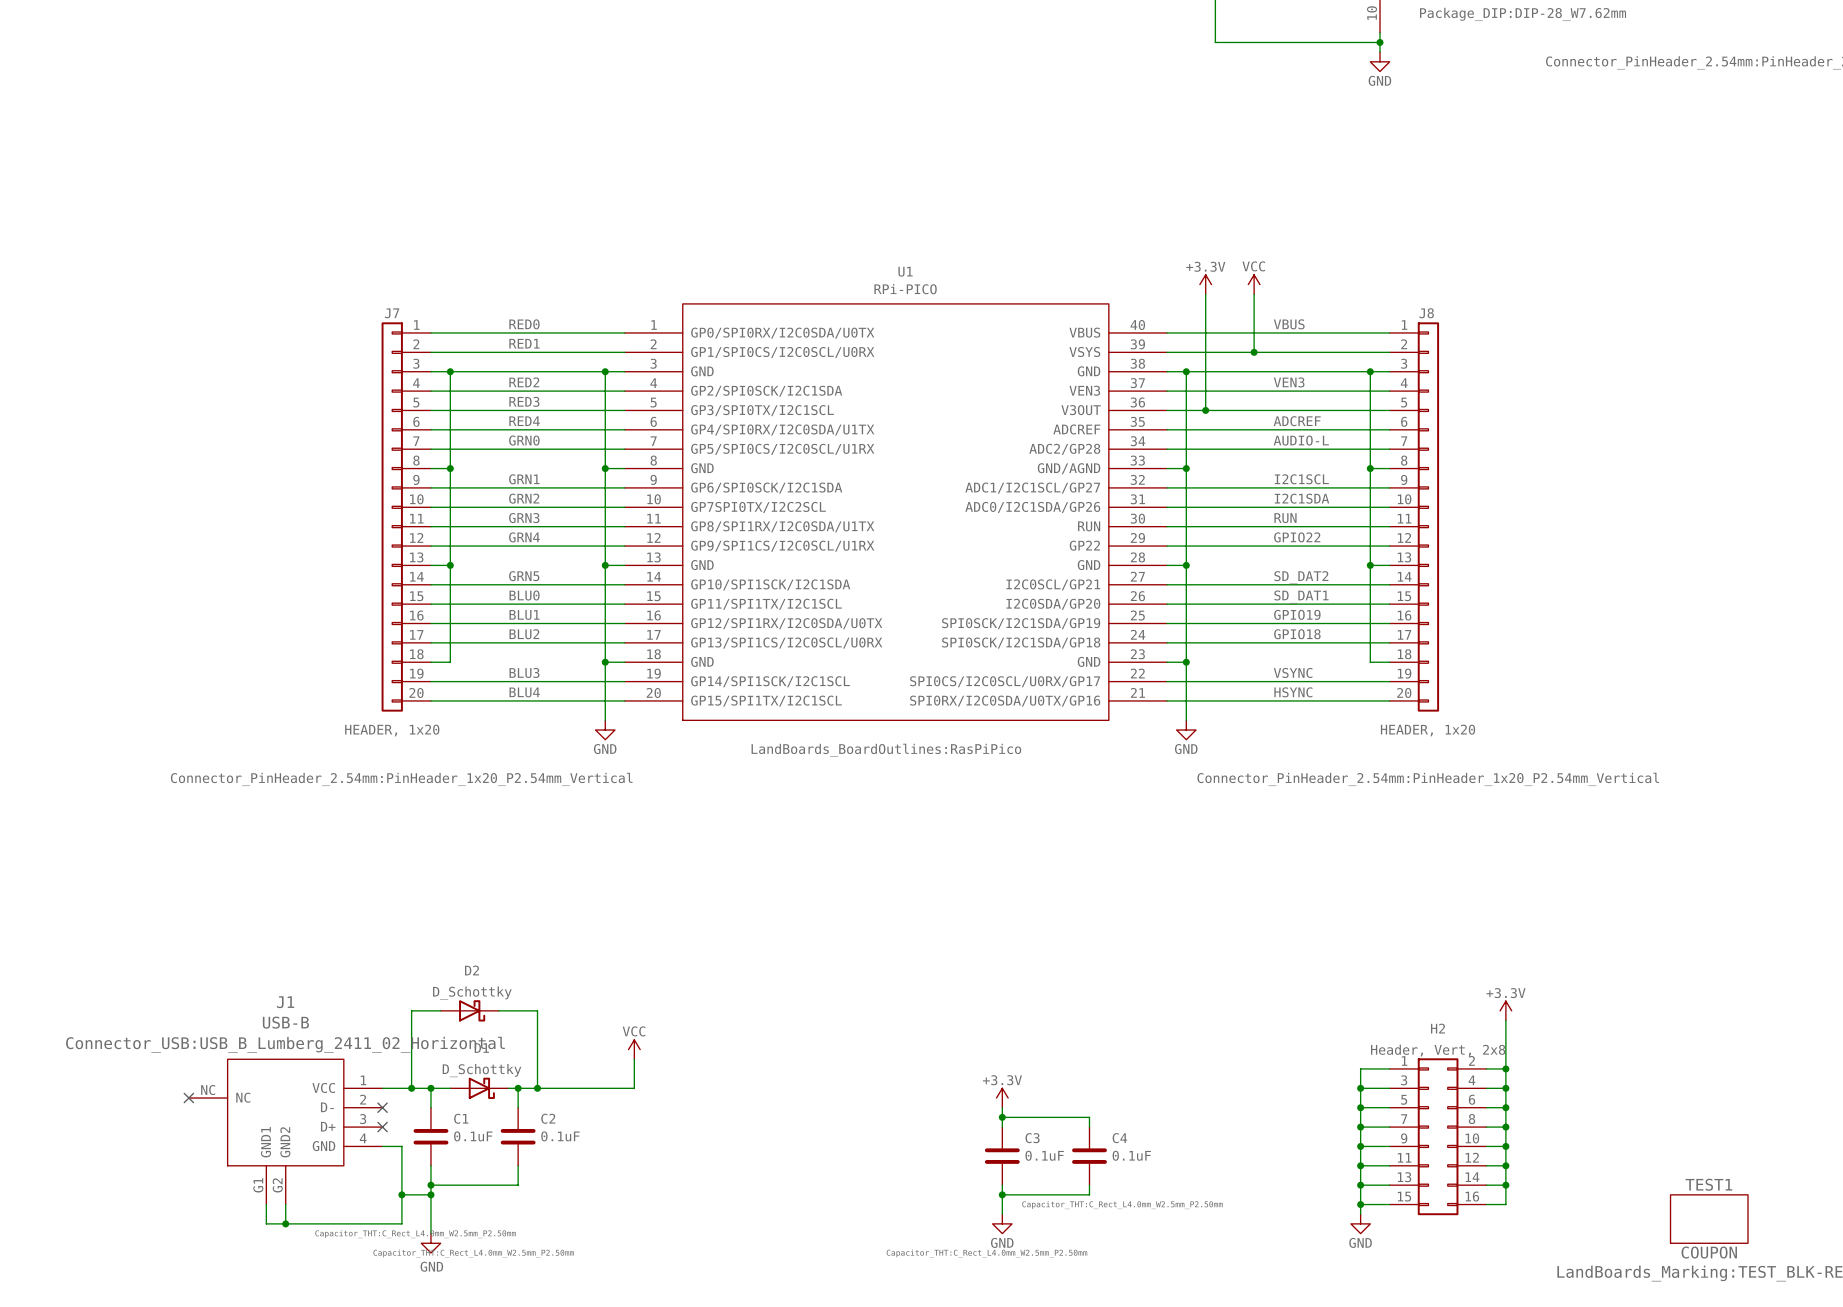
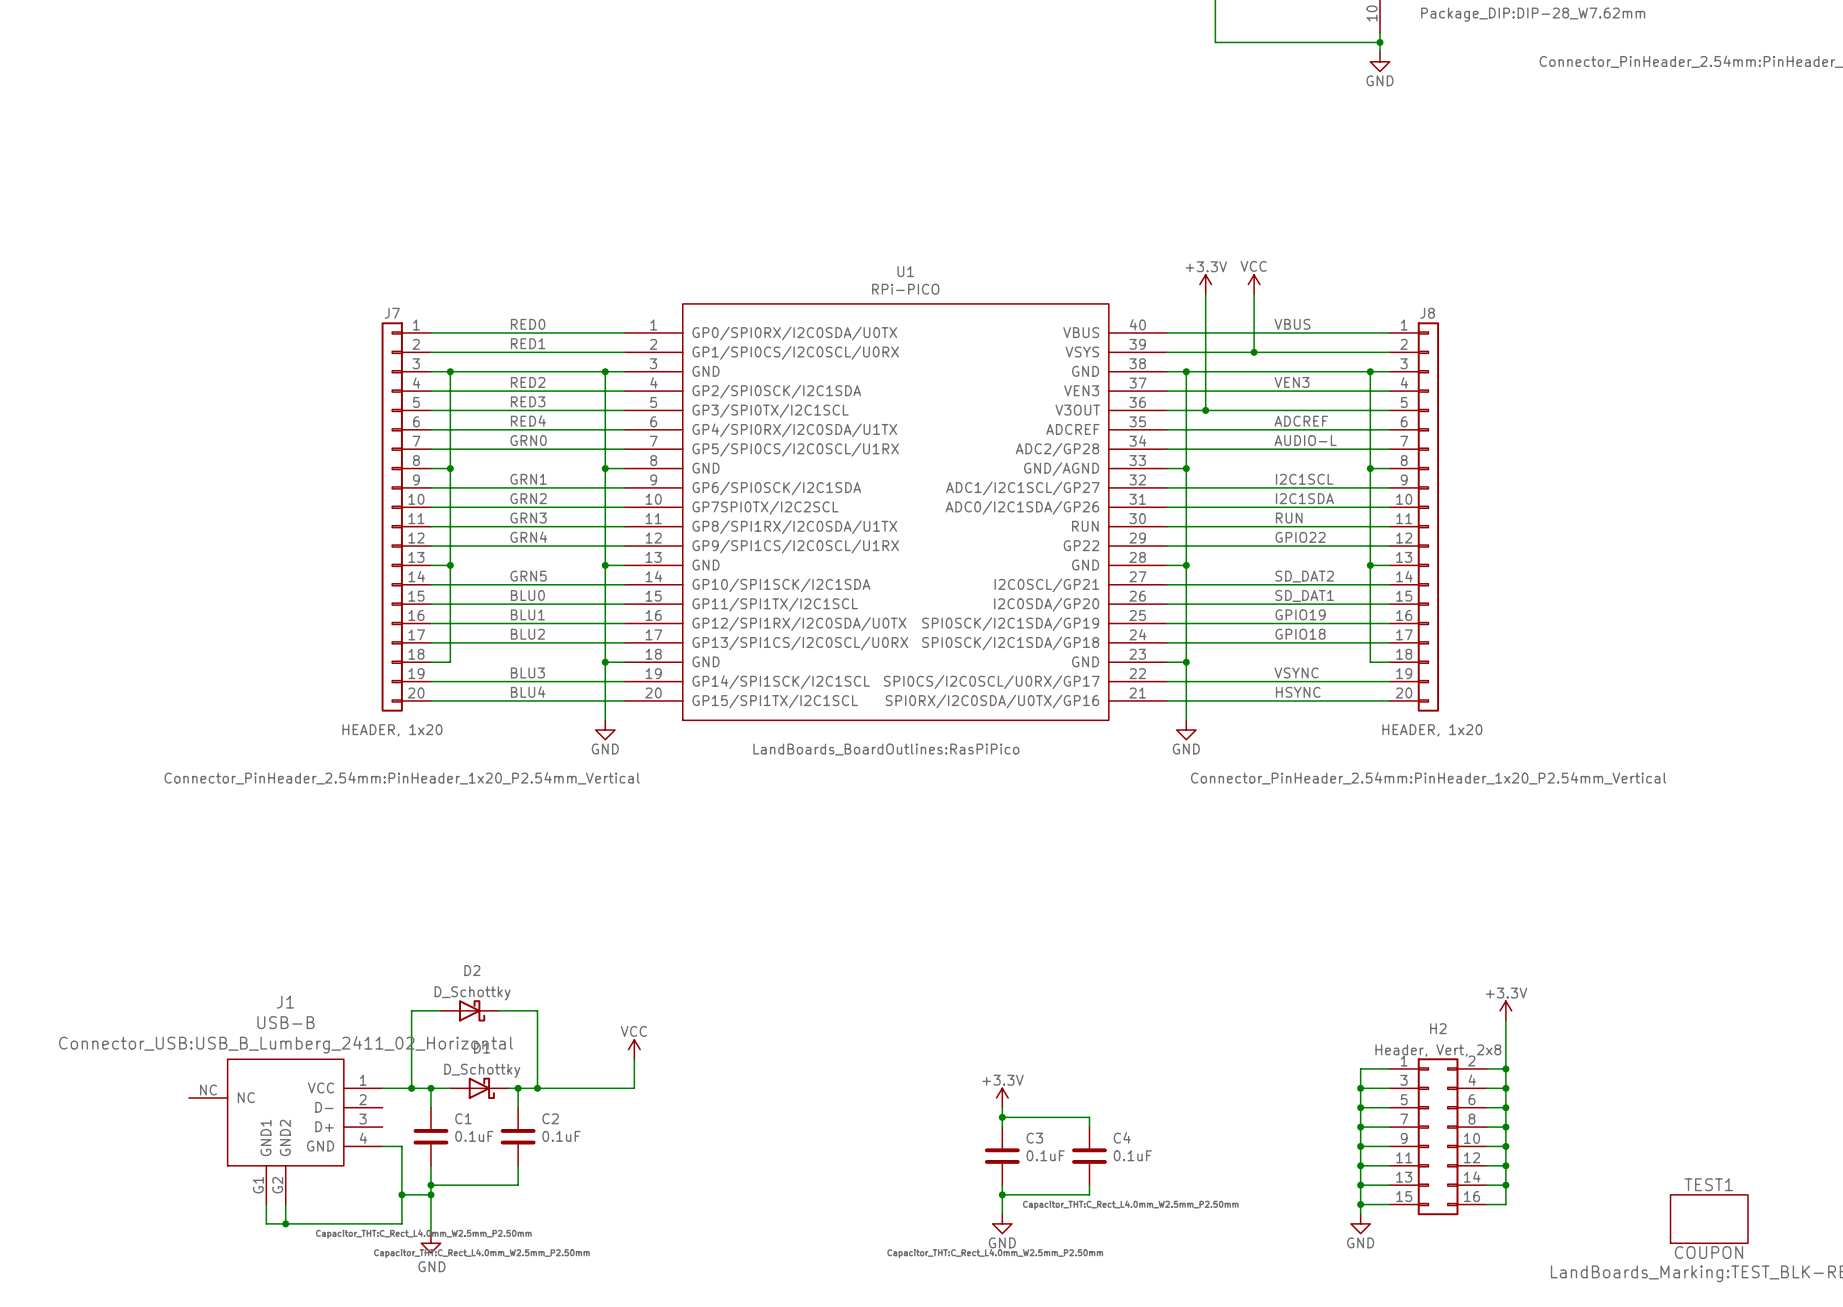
no-connect mark: (188, 1098) -> none
no-connect mark: (382, 1107) -> none
no-connect mark: (382, 1127) -> none

